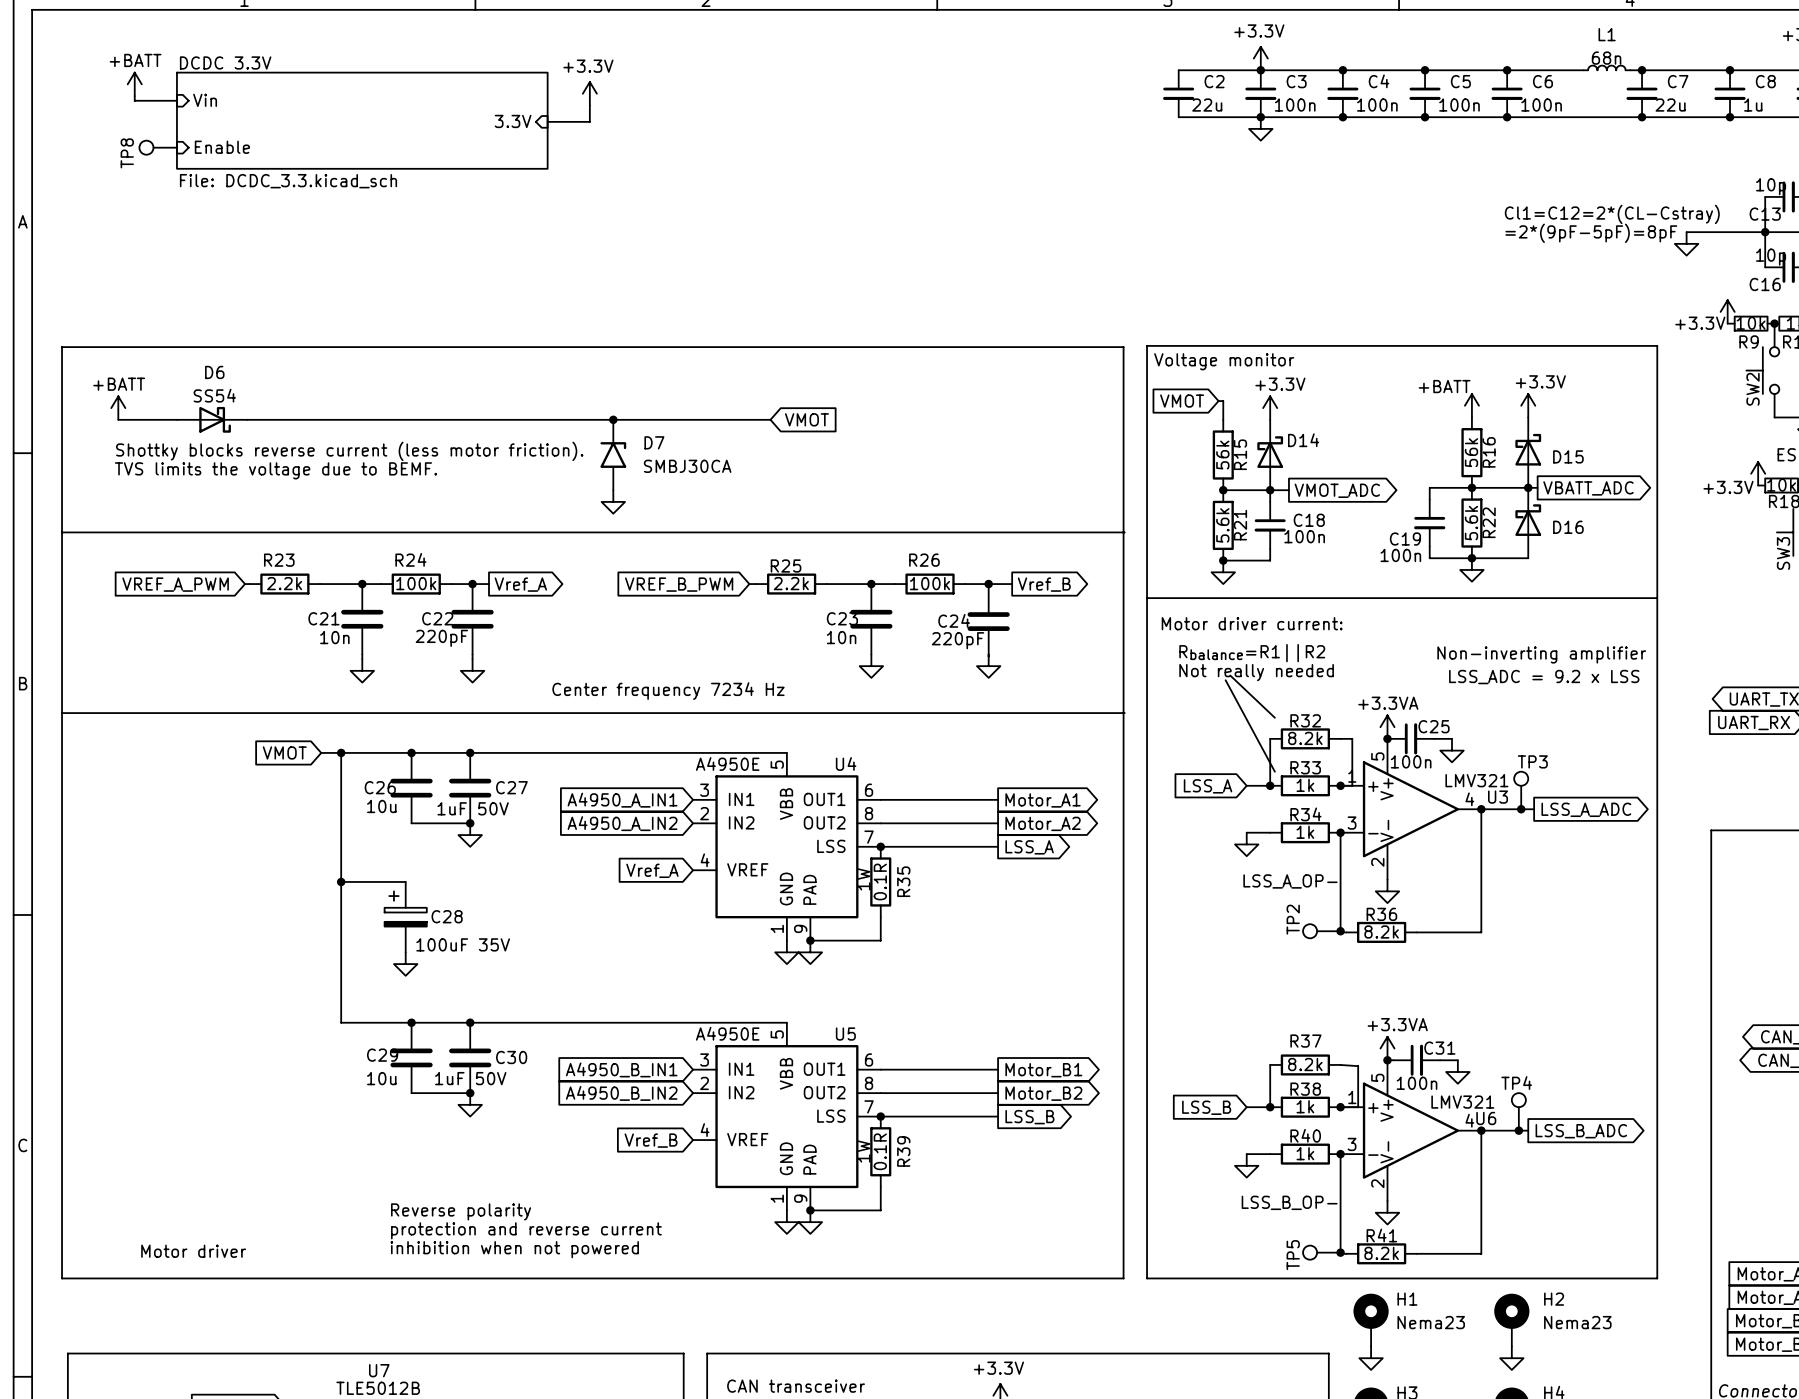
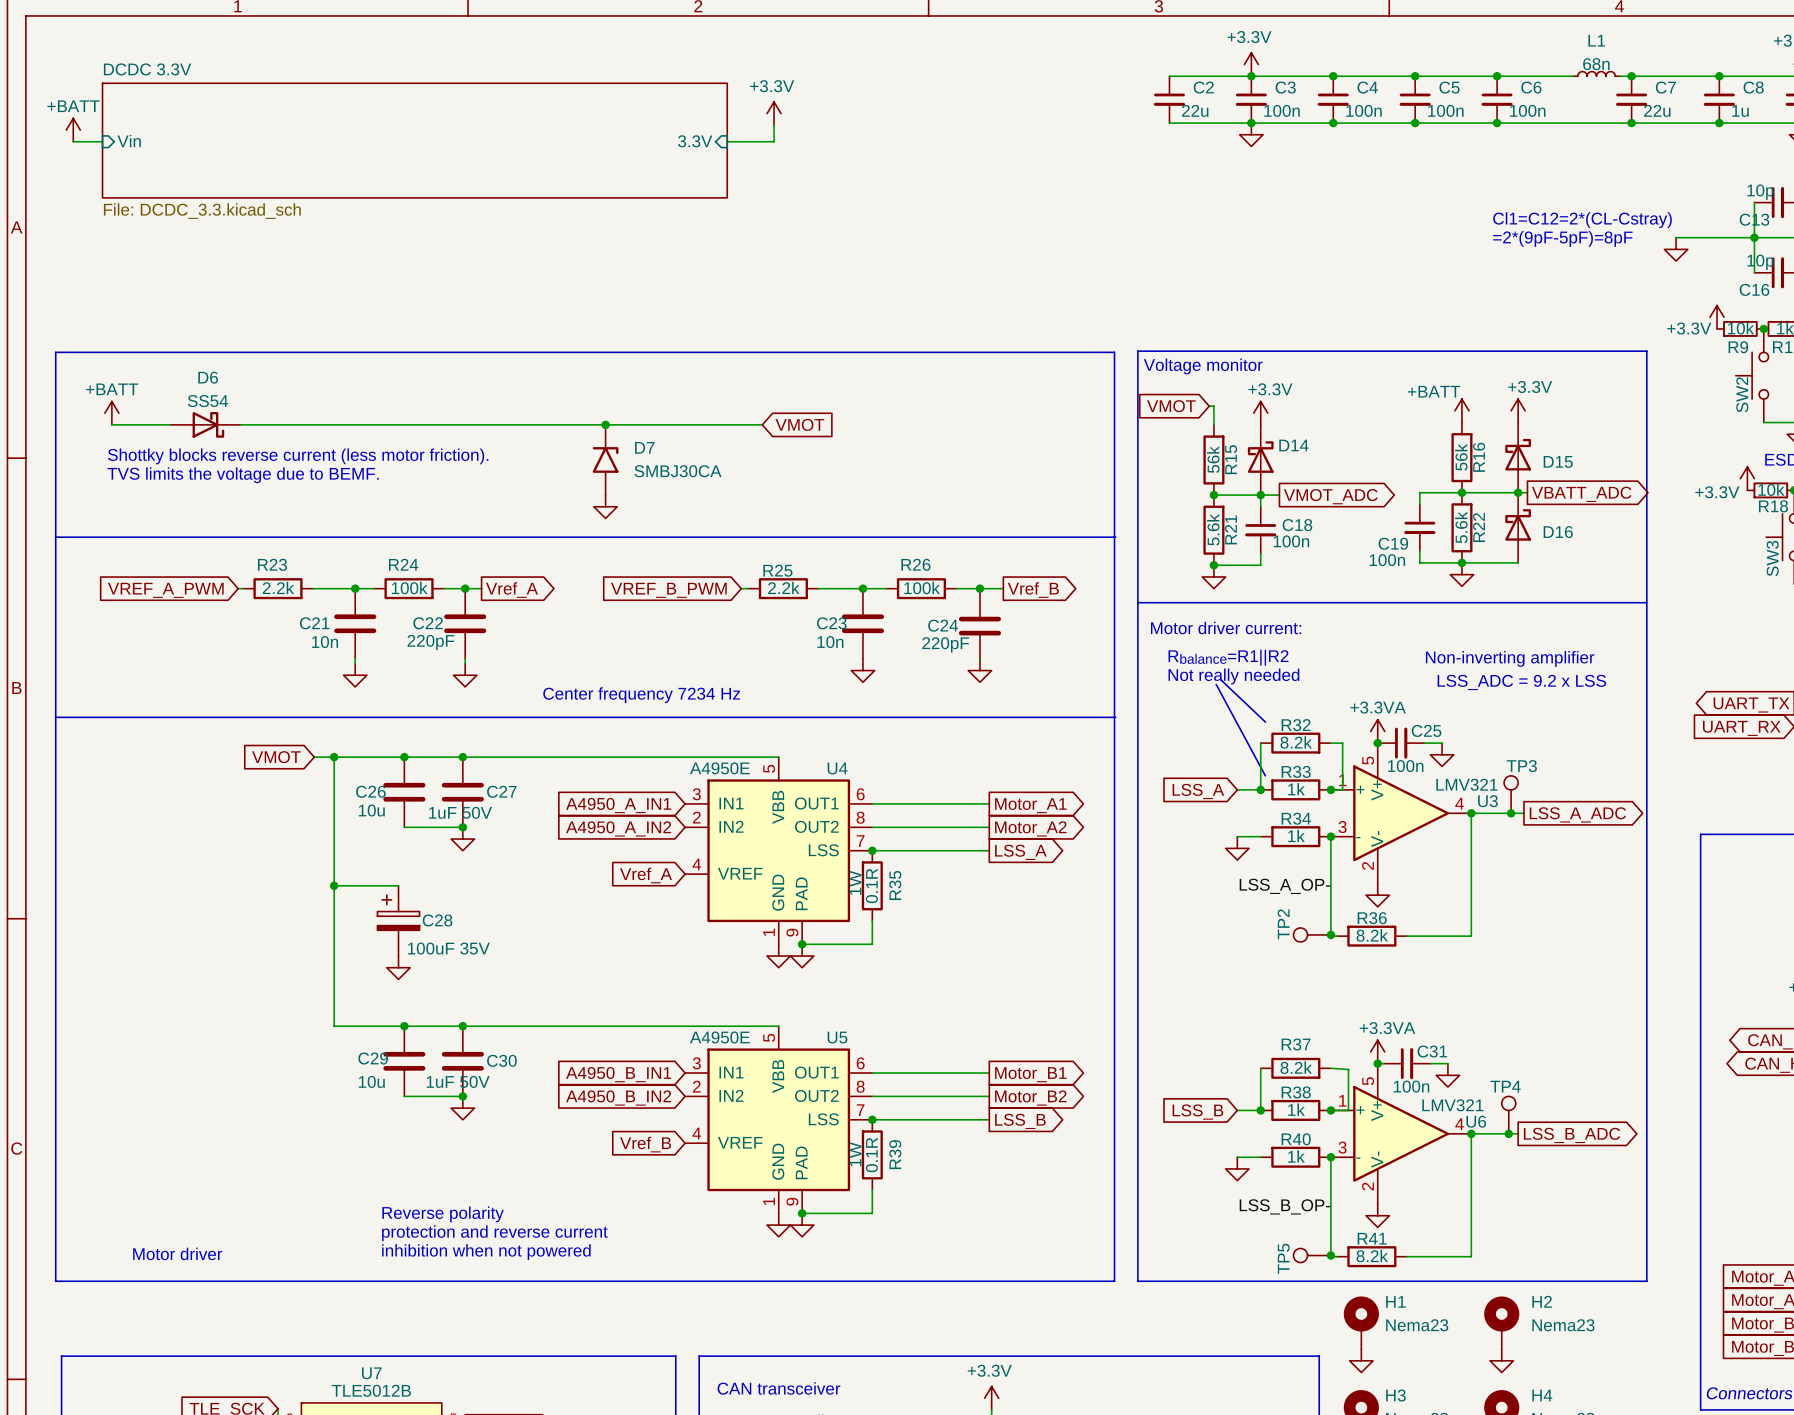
sheet DCDC 3.3V name position: DCDC 3.3V (225, 62) -> DCDC 3.3V (147, 69)
sheet DCDC 3.3V shape: [176, 71, 549, 170] -> [101, 82, 728, 199]
power symbol position: +BATT (134, 84) -> +BATT (73, 130)
power symbol position: +3.3V (589, 93) -> +3.3V (774, 113)
wire: (134, 96) (134, 100) (176, 100) -> none
sheet pin position: Vin (205, 100) -> Vin (129, 141)
wire: (589, 105) (589, 121) (547, 121) -> none
wire: none -> (774, 125) (774, 141) (727, 141)
sheet pin position: 3.3V (513, 121) -> 3.3V (695, 141)
wire: none -> (73, 141) (102, 141)
TP8: (158, 147) -> none
sheet pin: Enable (222, 147) -> none
sheet DCDC 3.3V value position: File: DCDC_3.3.kicad_sch (288, 181) -> File: DCDC_3.3.kicad_sch (202, 211)

